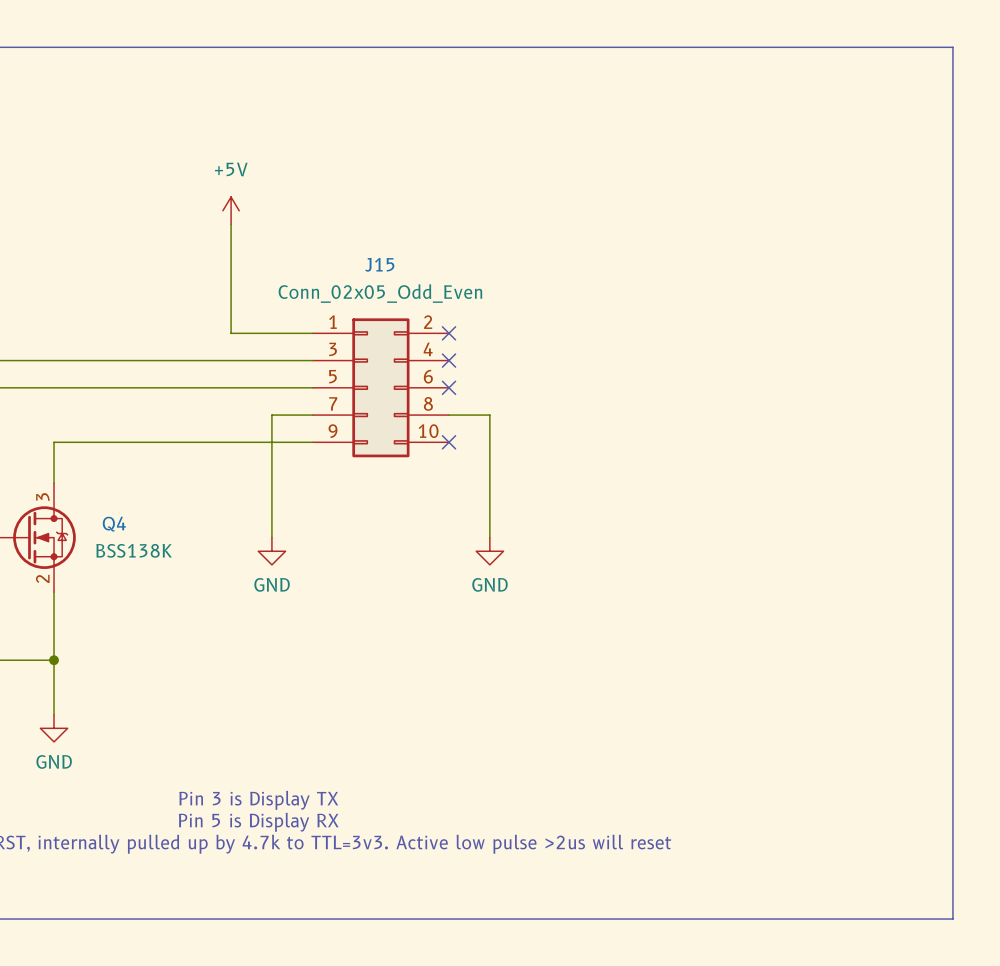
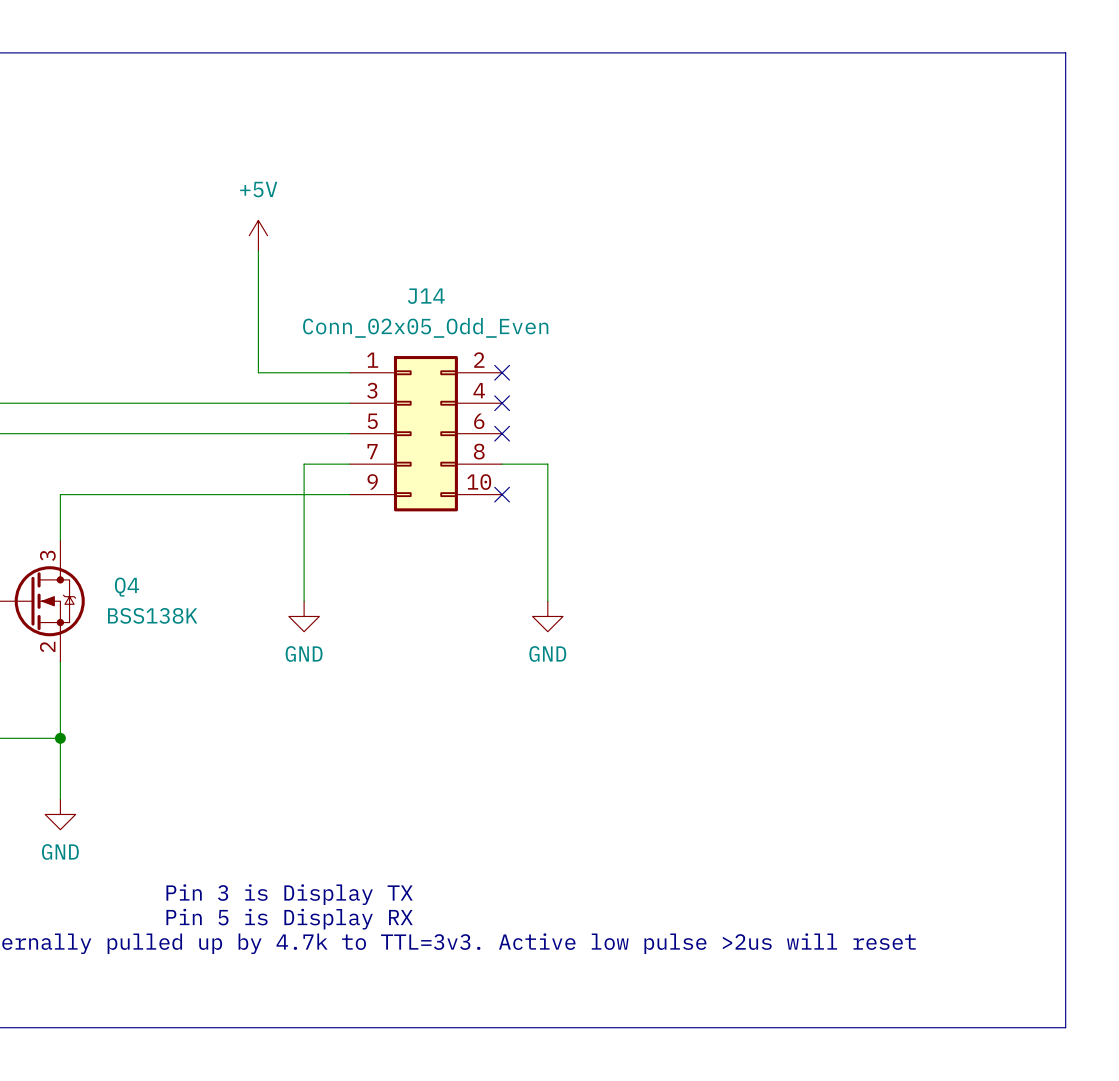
J15 name: J15 (379, 264) -> J14 (426, 296)

